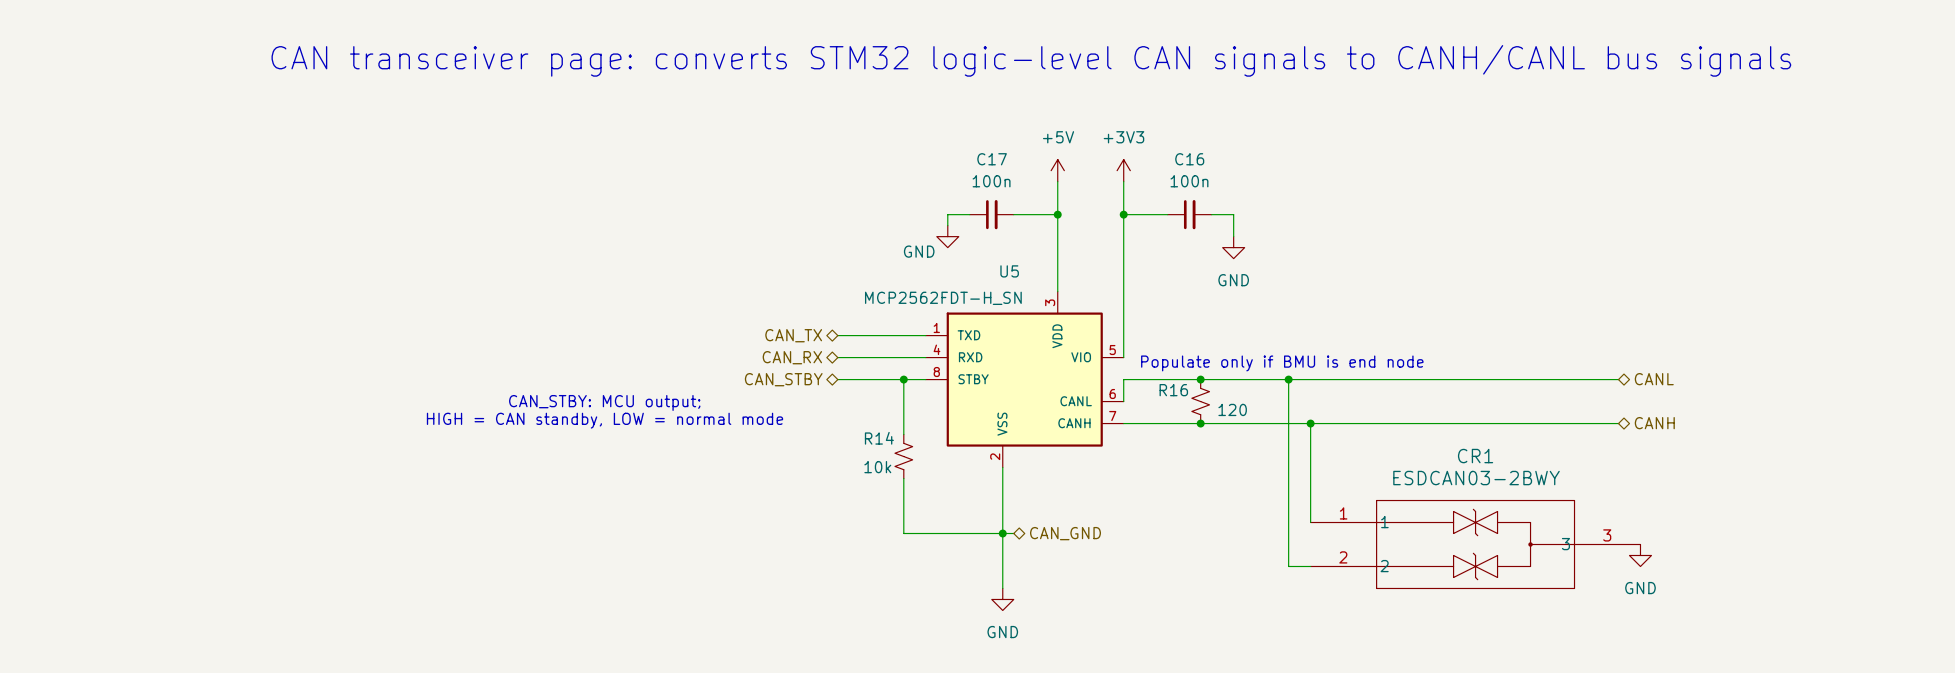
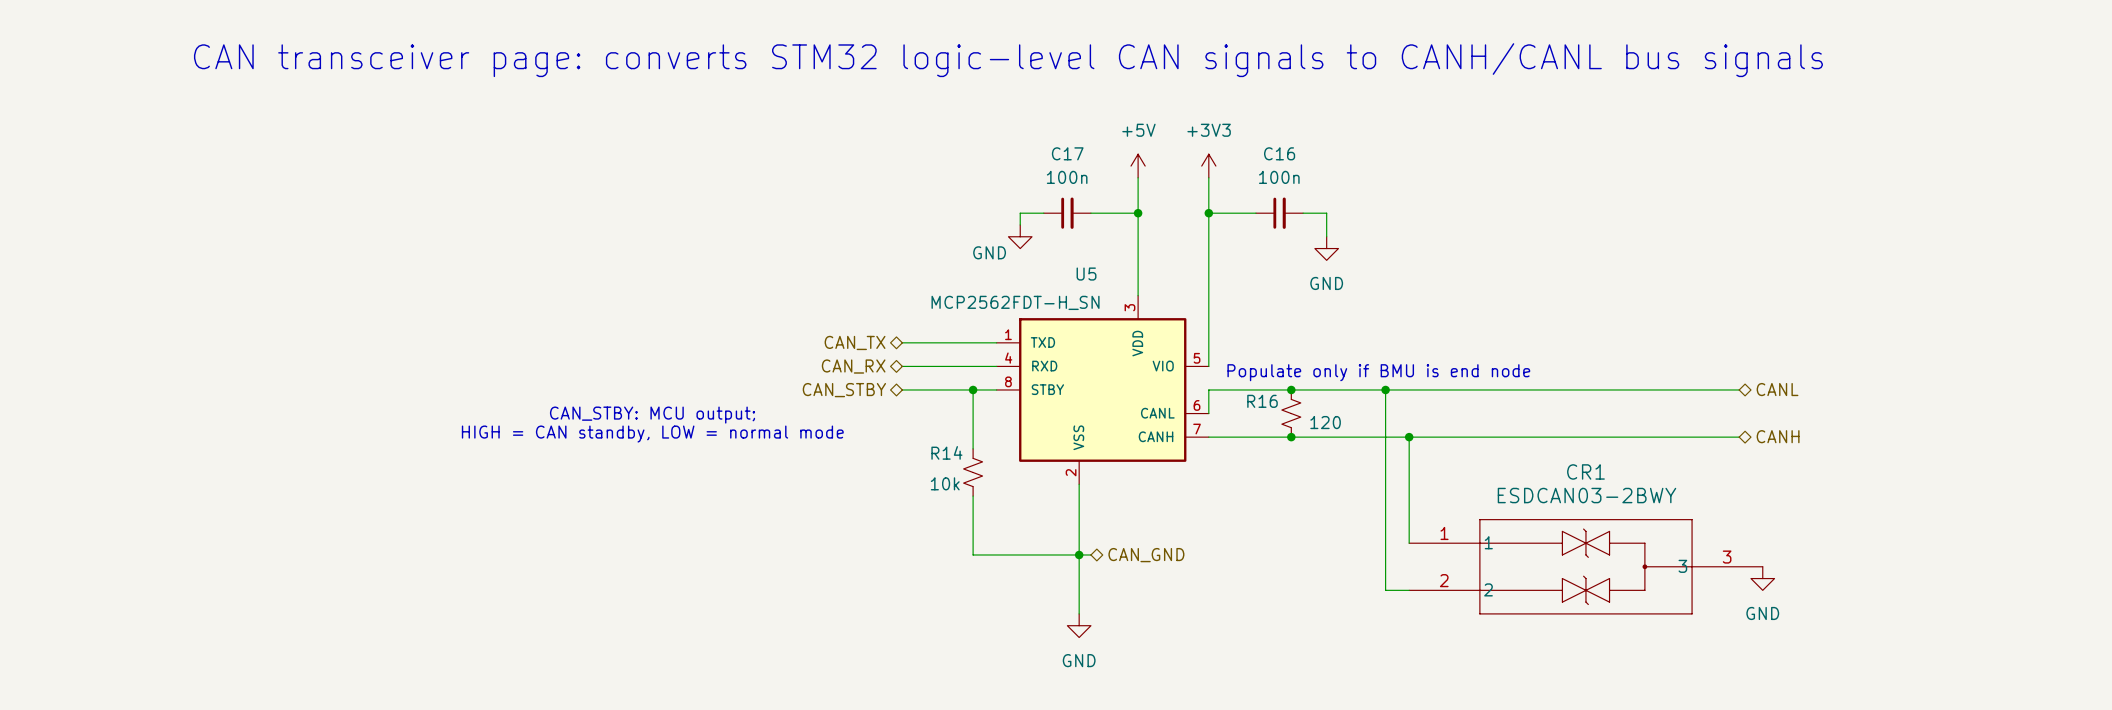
text position: CAN transceiver page: converts STM32 logic-level CAN signals to CANH/CANL bus signals (1031, 60) -> CAN transceiver page: converts STM32 logic-level CAN signals to CANH/CANL bus signals (1008, 60)

